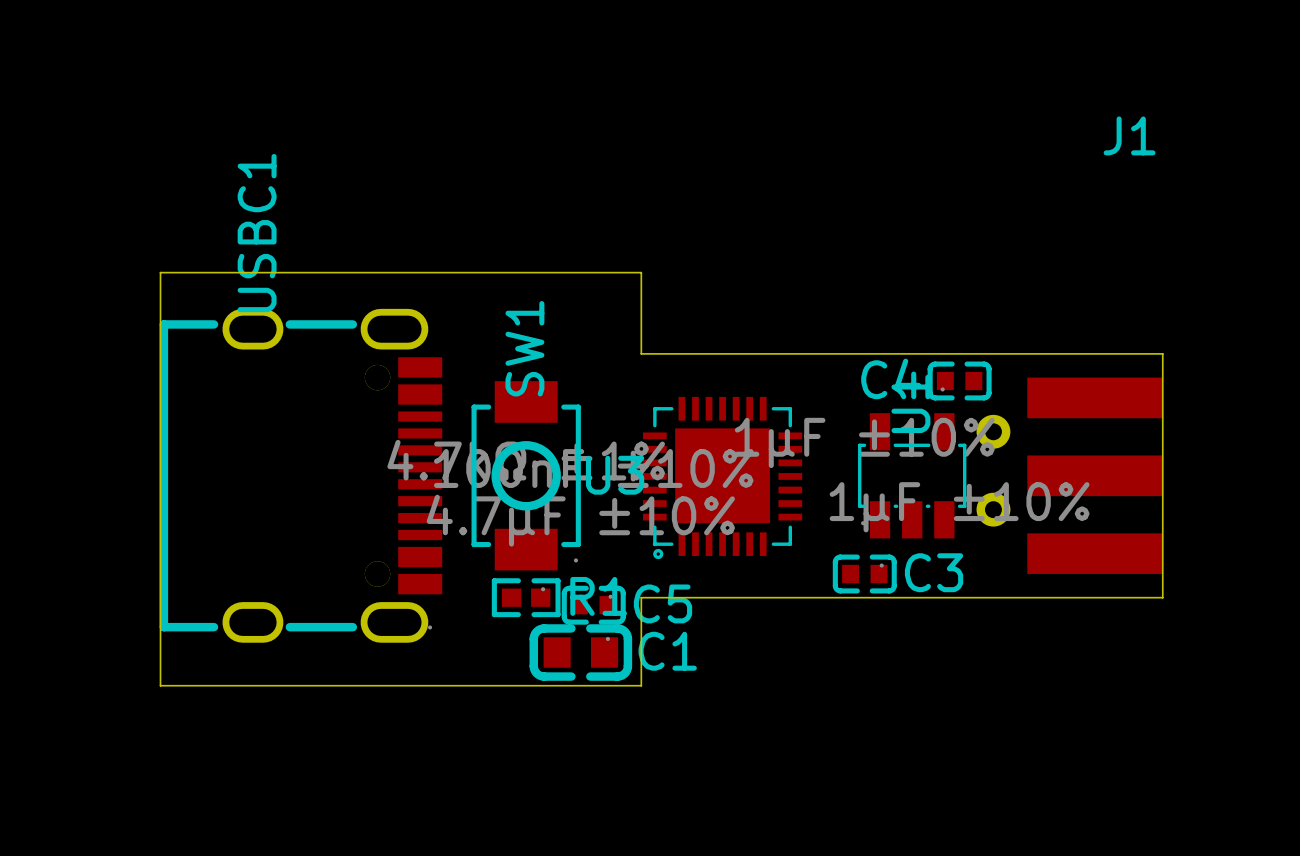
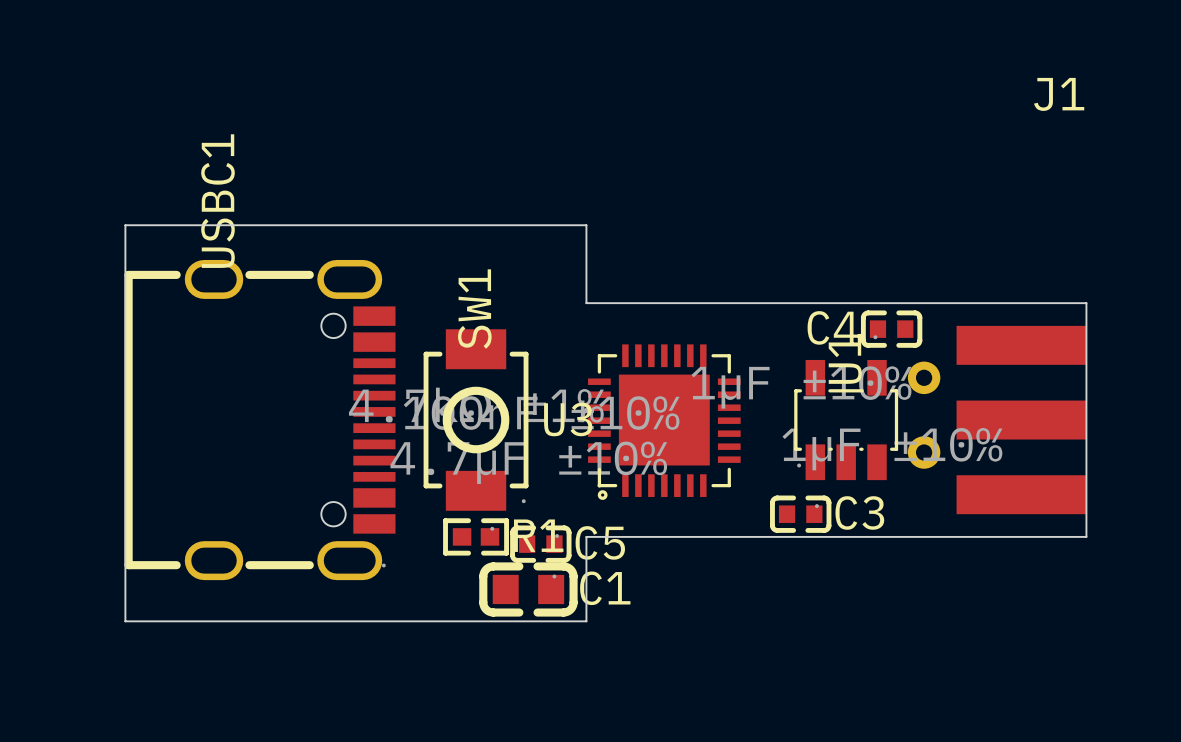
USBC1 footprint: [159, 308, 443, 643] -> [124, 259, 396, 581]

